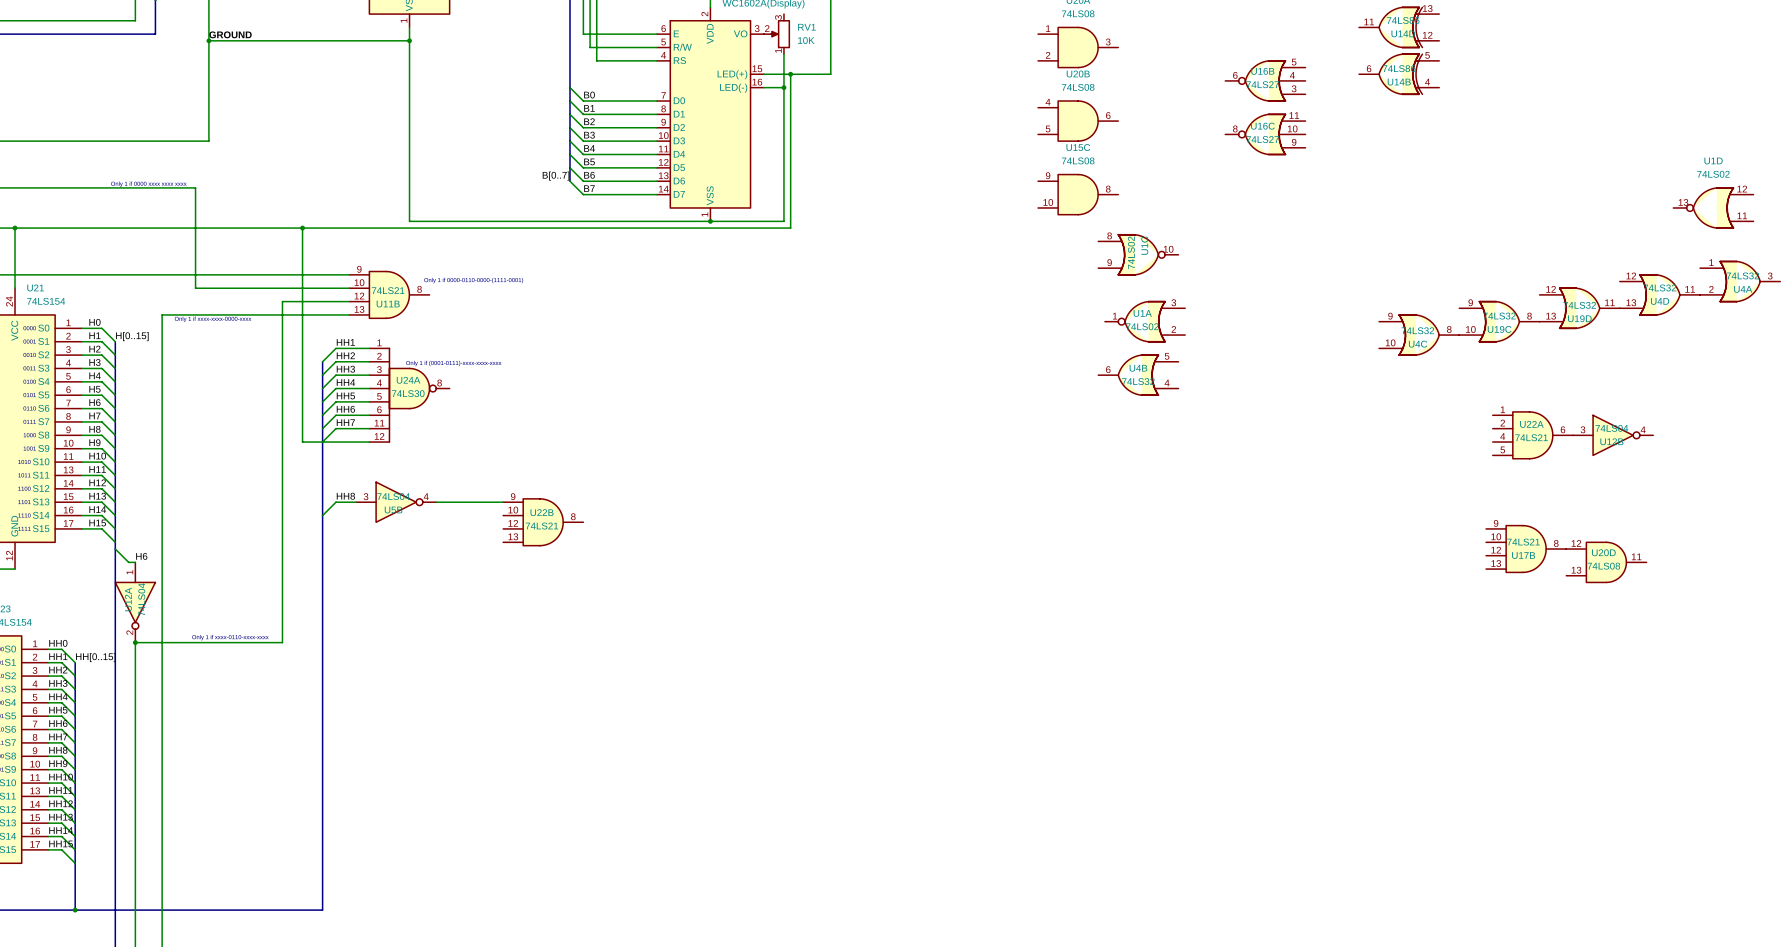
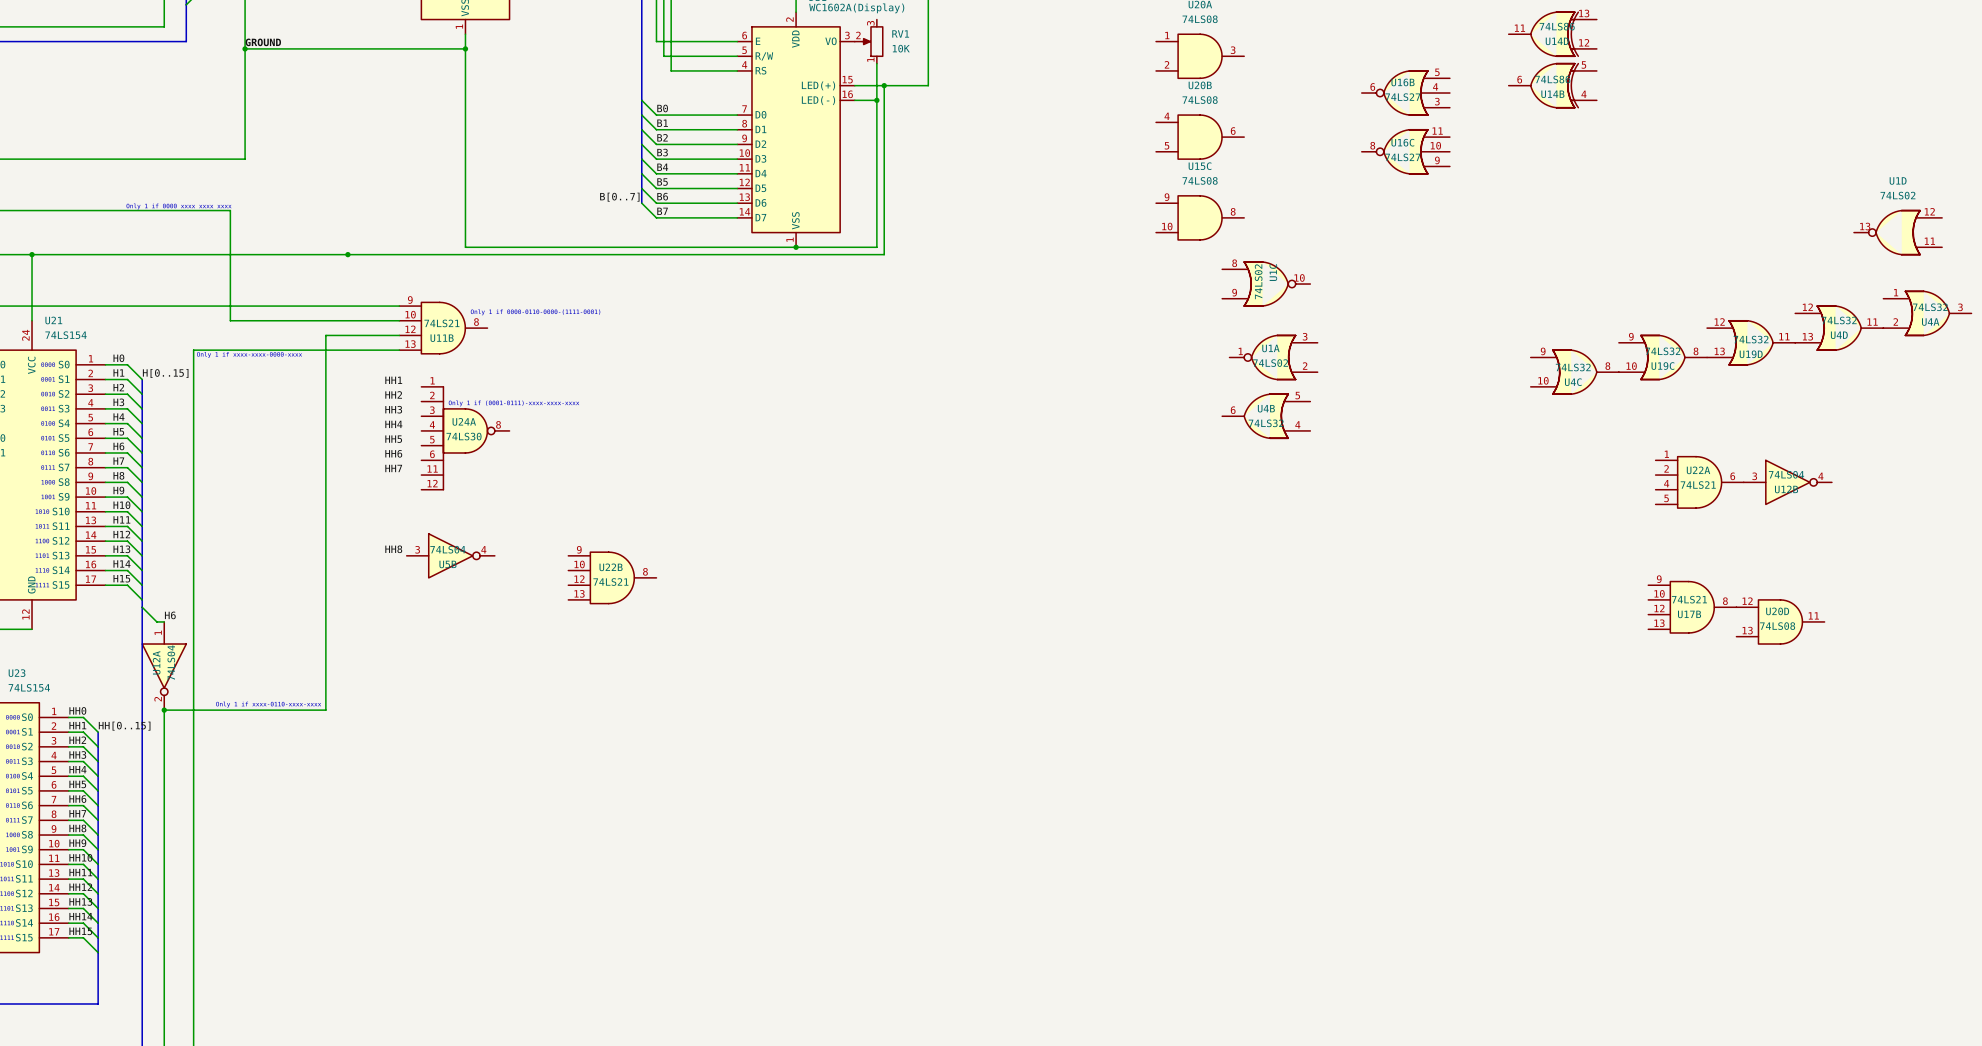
wire: (302, 228) (302, 442) (369, 442) -> none
wire: (369, 348) (335, 348) (322, 361) -> none
bus: (322, 361) (322, 910) (75, 910) -> none
wire: (369, 361) (335, 361) (322, 375) -> none
wire: (369, 375) (335, 375) (322, 388) -> none
wire: (369, 388) (335, 388) (322, 401) -> none
wire: (369, 401) (335, 401) (322, 415) -> none
wire: (369, 415) (335, 415) (322, 428) -> none
wire: (369, 428) (335, 428) (322, 442) -> none
wire: (356, 502) (335, 502) (322, 515) -> none
wire: (436, 502) (503, 502) -> none
junction: (75, 910) -> none

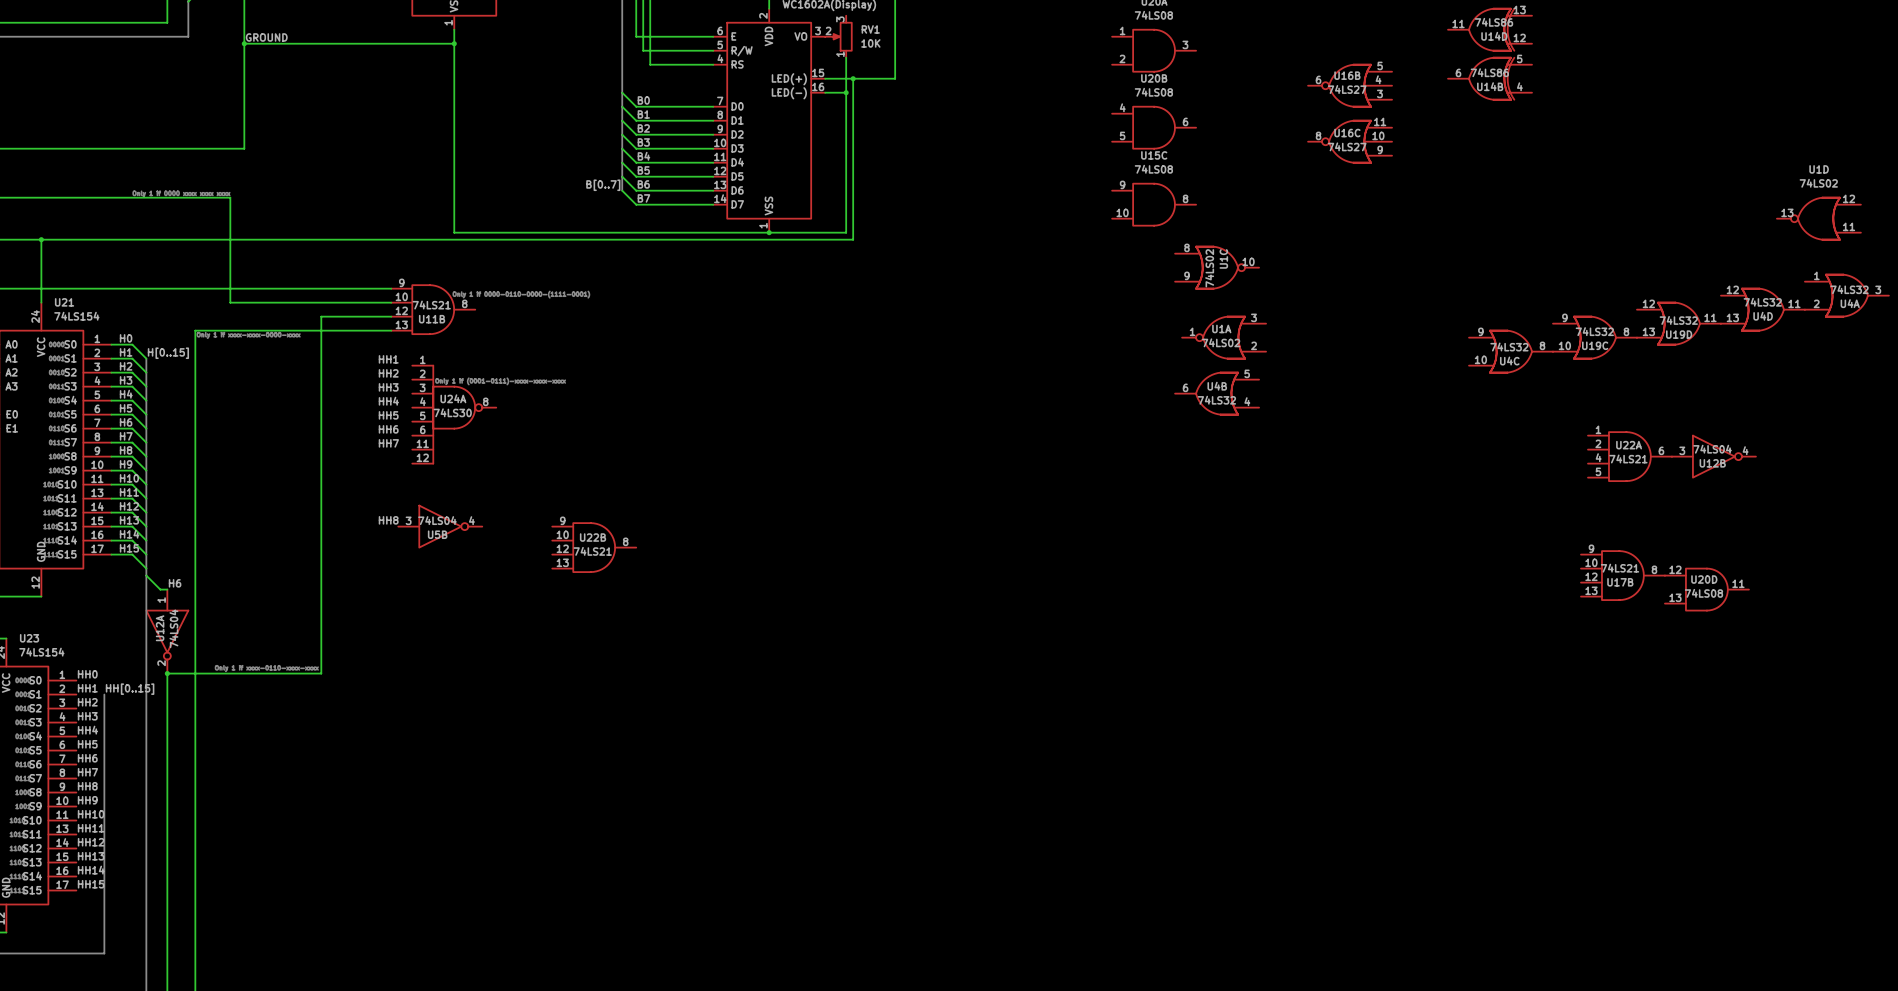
junction: (347, 254) -> none
wire: (68, 717) (83, 717) (98, 732) -> none
wire: (68, 732) (83, 732) (98, 746) -> none
wire: (68, 746) (83, 746) (98, 761) -> none
wire: (68, 761) (83, 761) (98, 776) -> none
wire: (68, 776) (83, 776) (98, 790) -> none
wire: (68, 790) (83, 790) (98, 805) -> none
wire: (68, 805) (83, 805) (98, 820) -> none
wire: (68, 820) (83, 820) (98, 835) -> none
wire: (68, 835) (83, 835) (98, 849) -> none
wire: (68, 849) (83, 849) (98, 864) -> none
wire: (68, 864) (83, 864) (98, 879) -> none
wire: (68, 879) (83, 879) (98, 893) -> none
wire: (68, 893) (83, 893) (98, 908) -> none
wire: (68, 908) (83, 908) (98, 923) -> none
wire: (68, 923) (83, 923) (98, 937) -> none
wire: (68, 937) (83, 937) (98, 952) -> none

